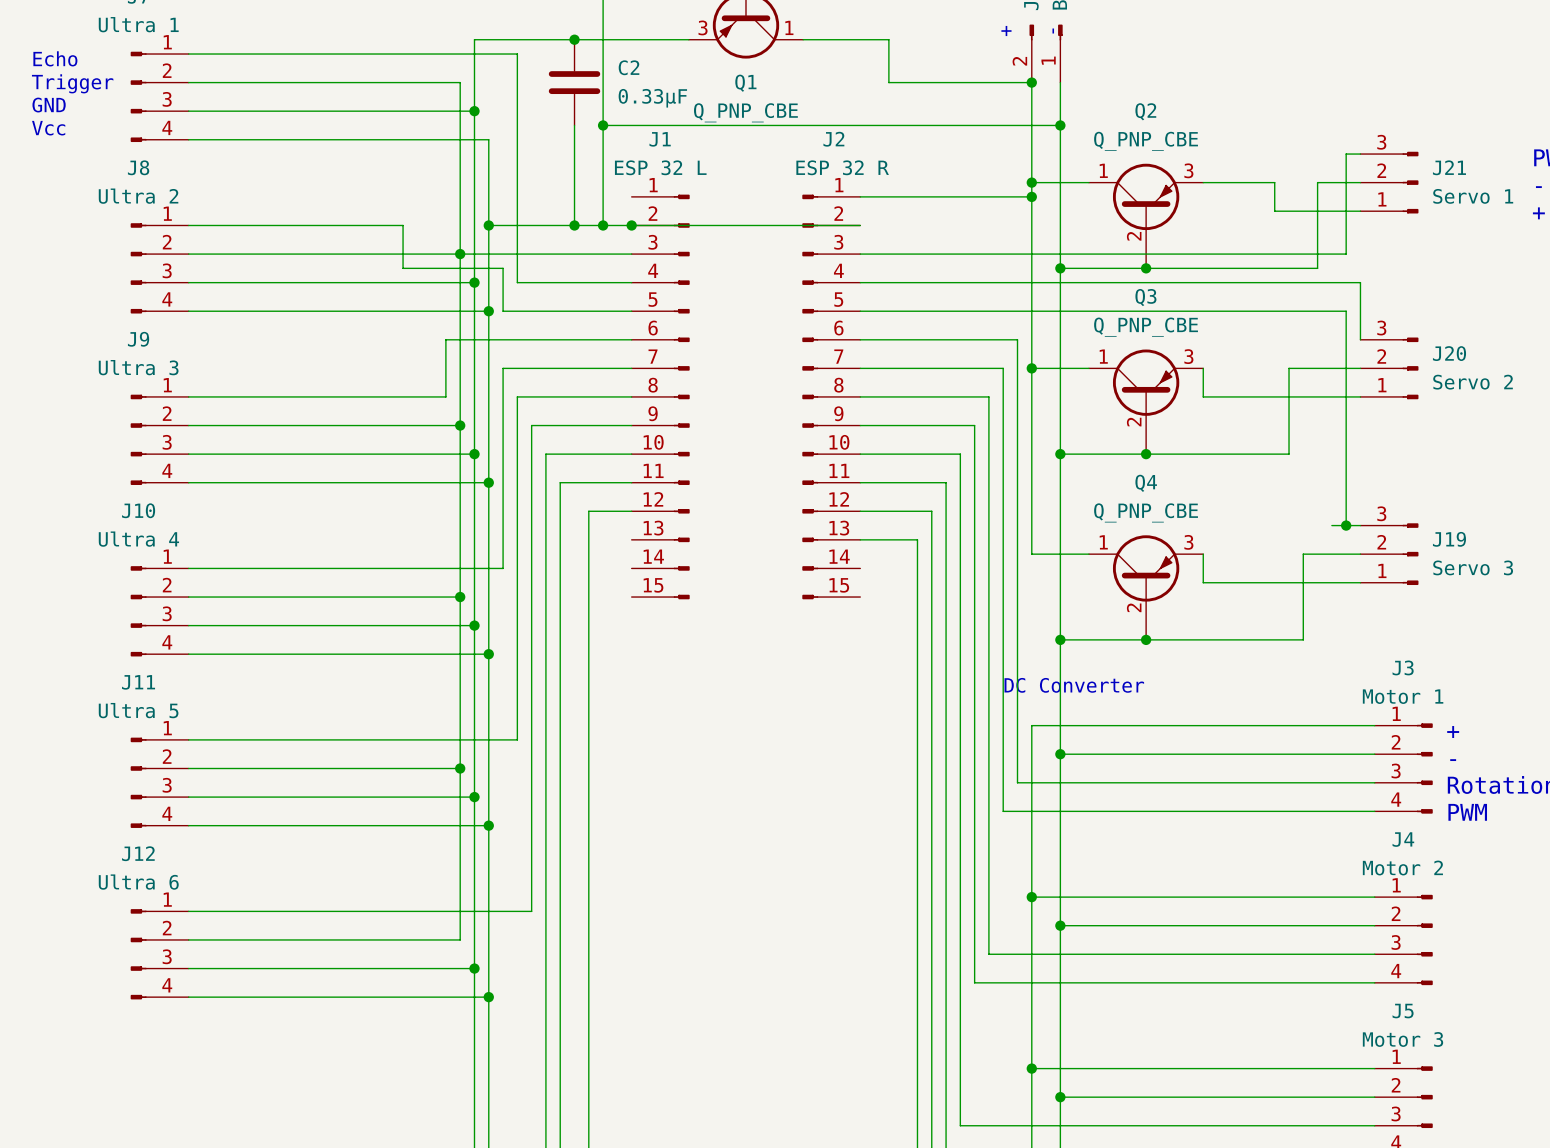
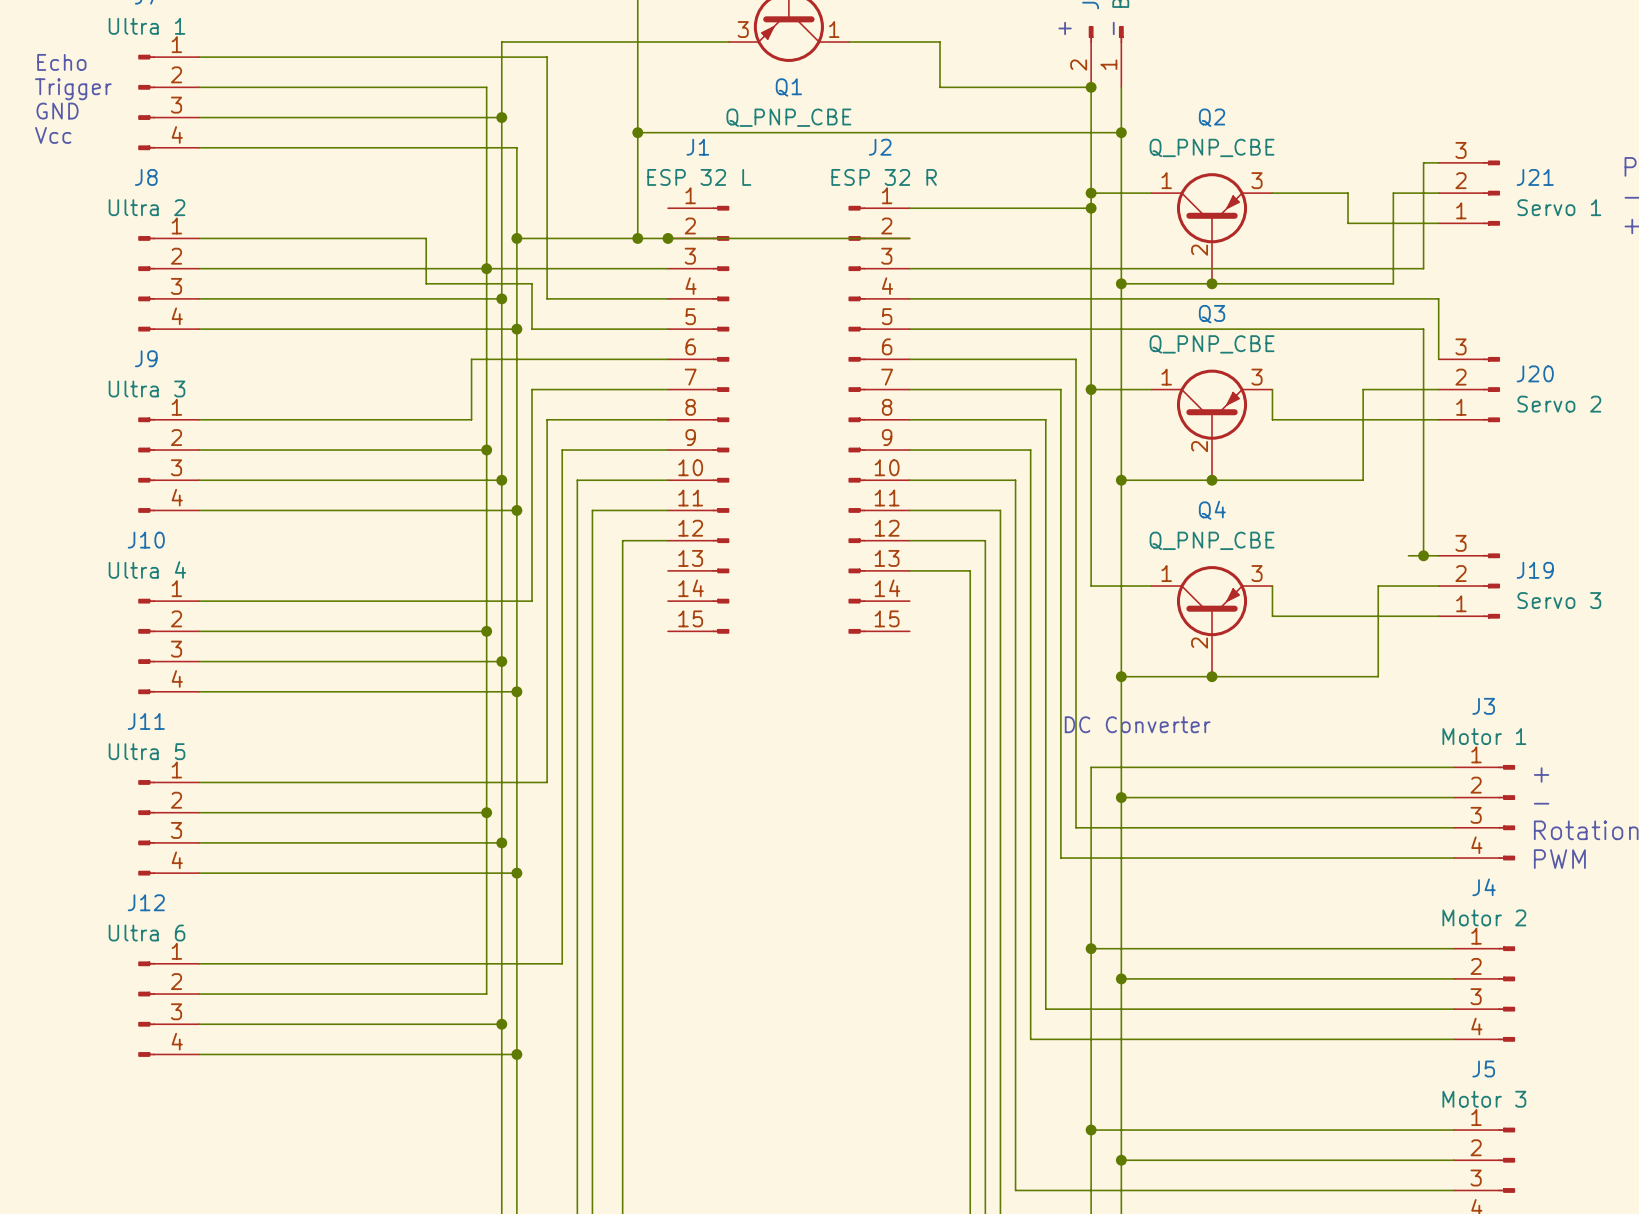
junction: (574, 39) -> none
C2: 0.33µF (574, 82) -> none
wire: (574, 125) (574, 225) -> none
junction: (574, 225) -> none

